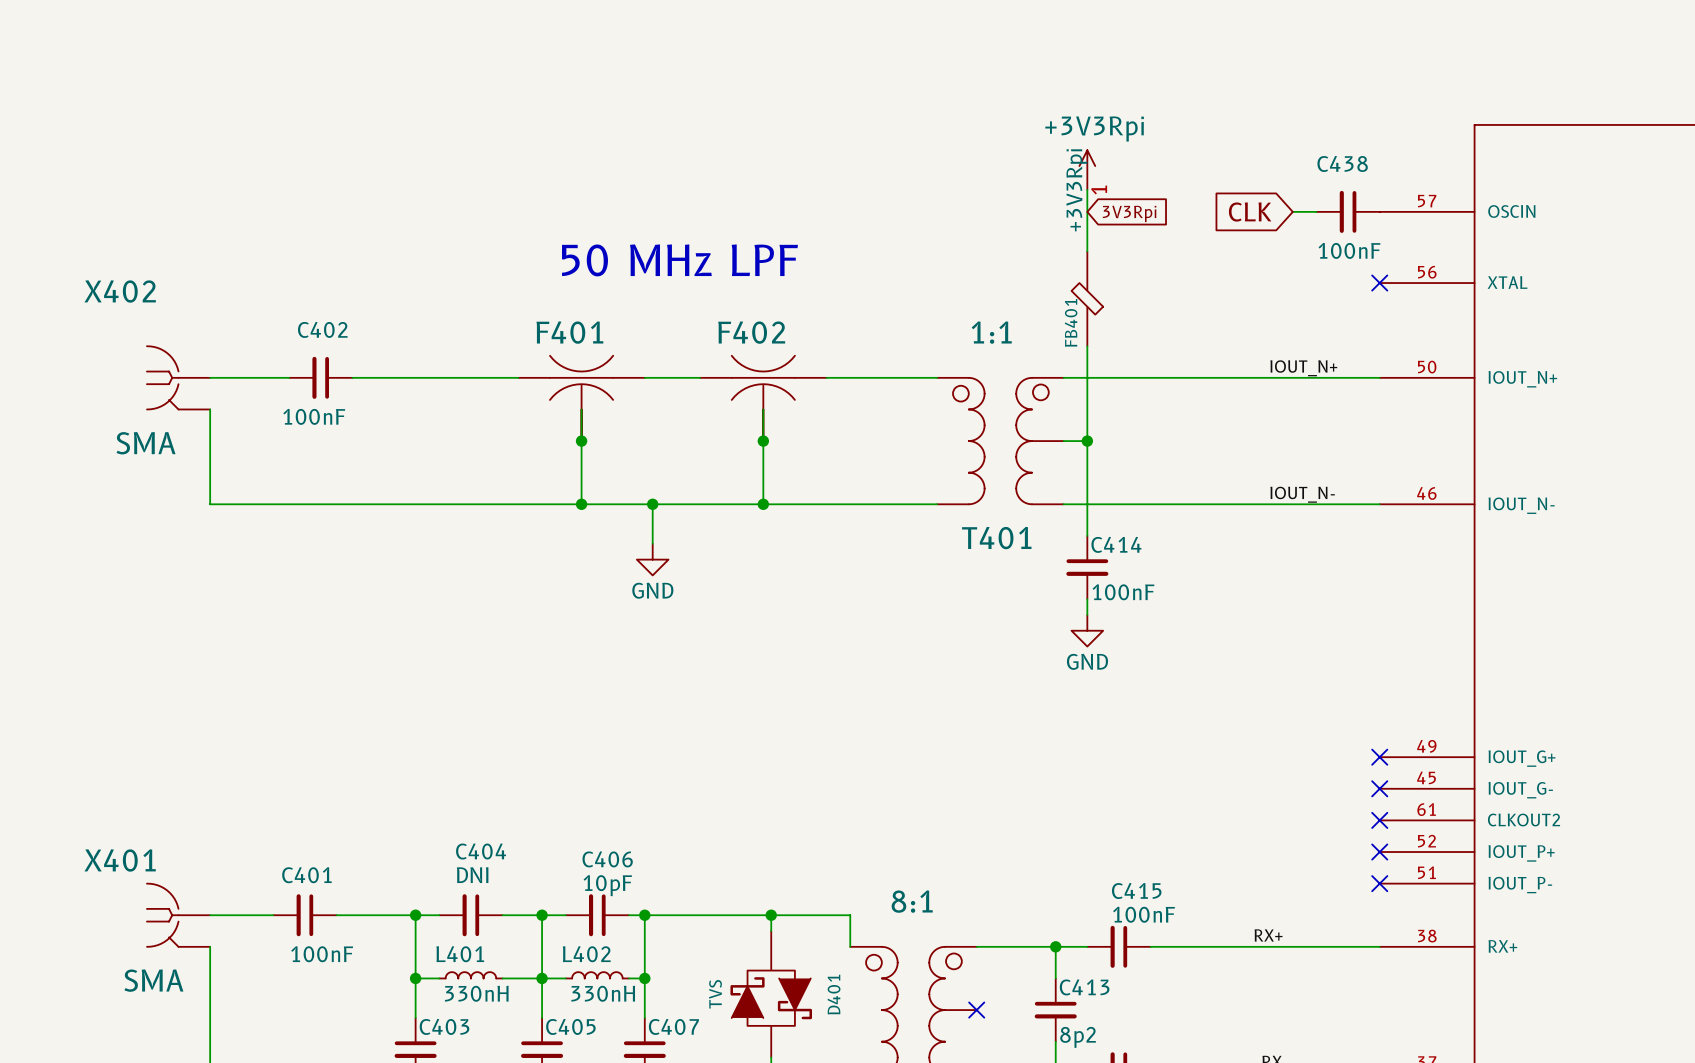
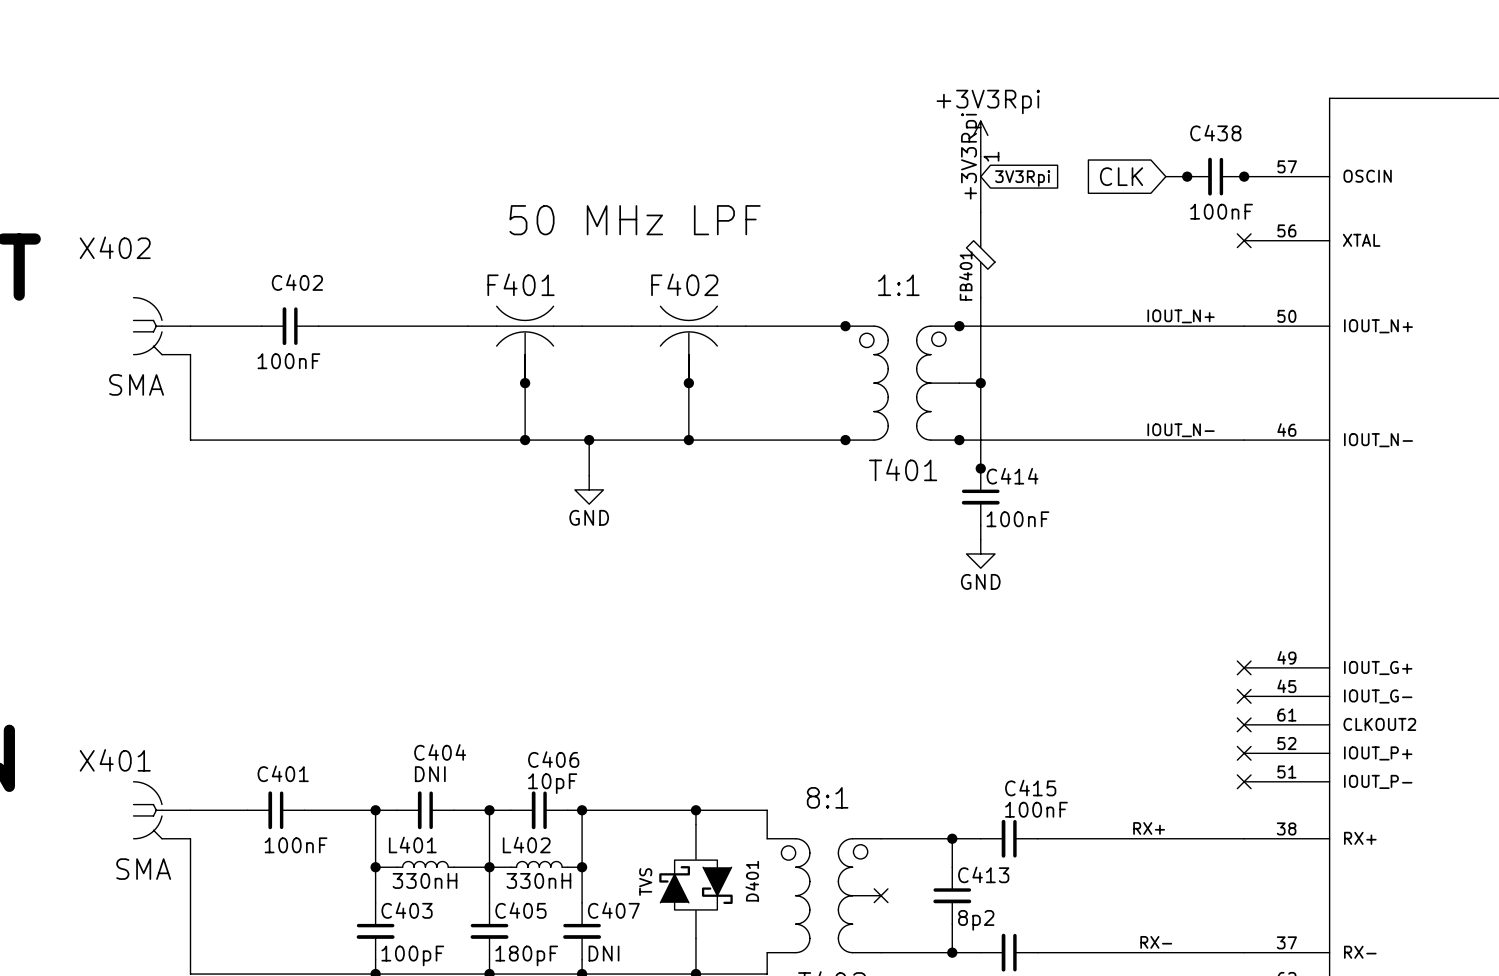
junction: none -> (1187, 176)
junction: none -> (1244, 176)
junction: none -> (845, 326)
junction: none -> (959, 326)
junction: none -> (845, 440)
junction: none -> (959, 440)
junction: none -> (980, 468)

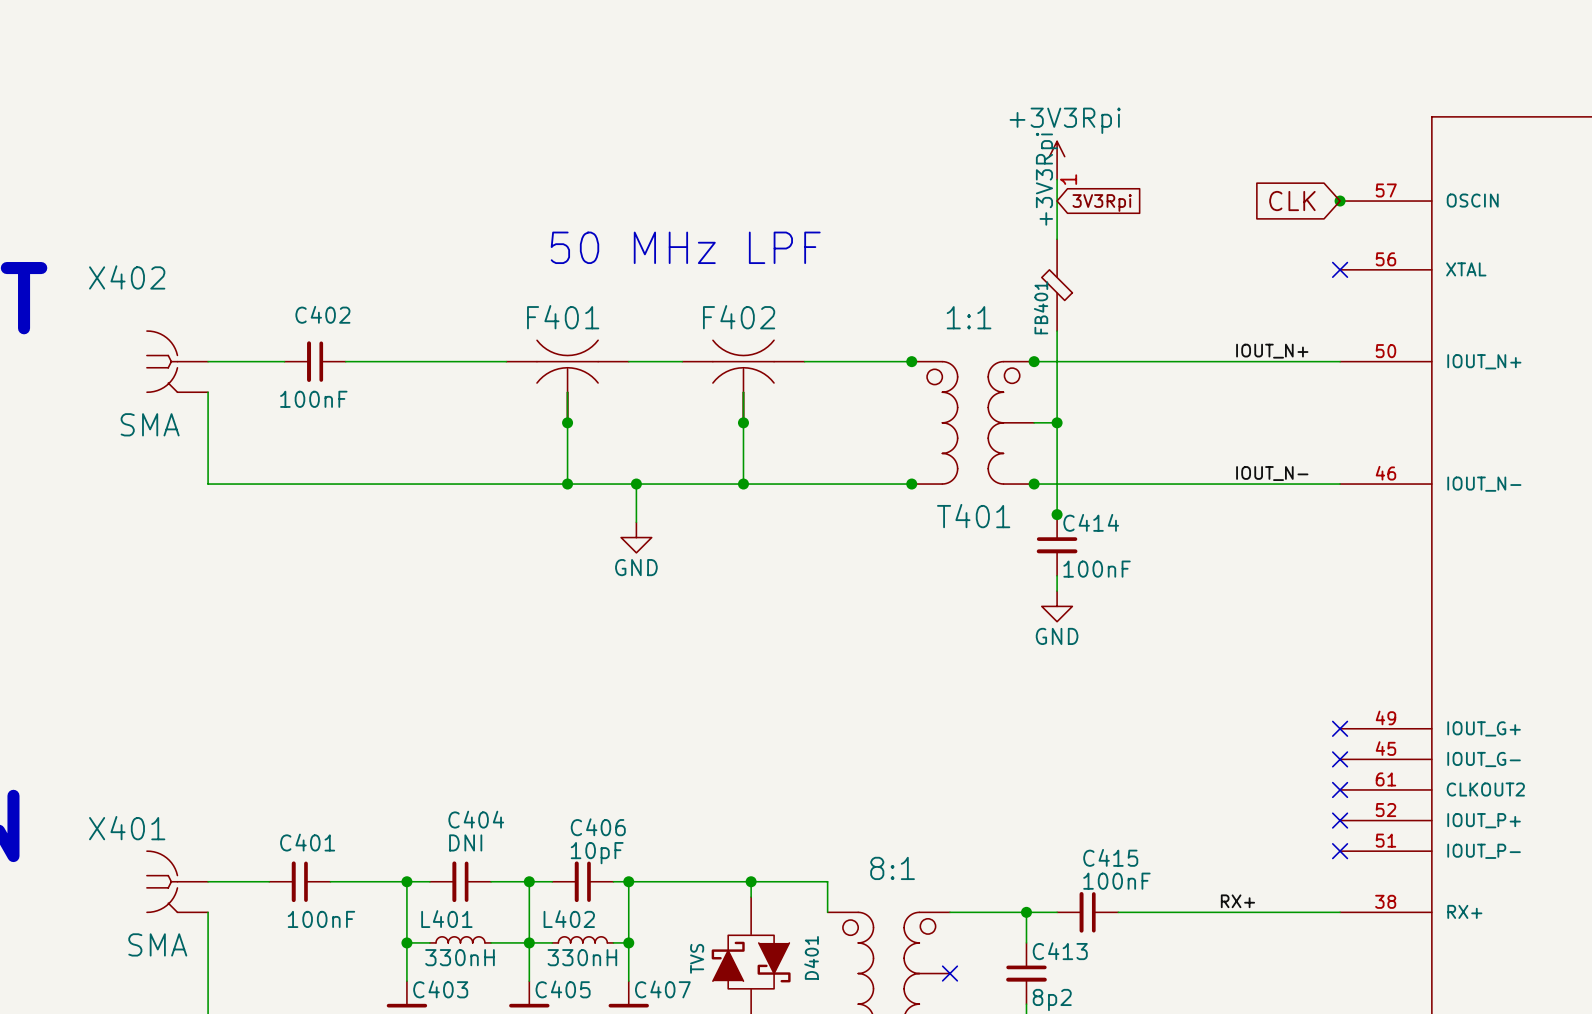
global label position: CLK (1121, 176) -> CLK (1292, 201)
wire: (1165, 176) (1187, 176) -> none
junction: (1187, 176) -> none
C438: 100nF (1215, 176) -> none

